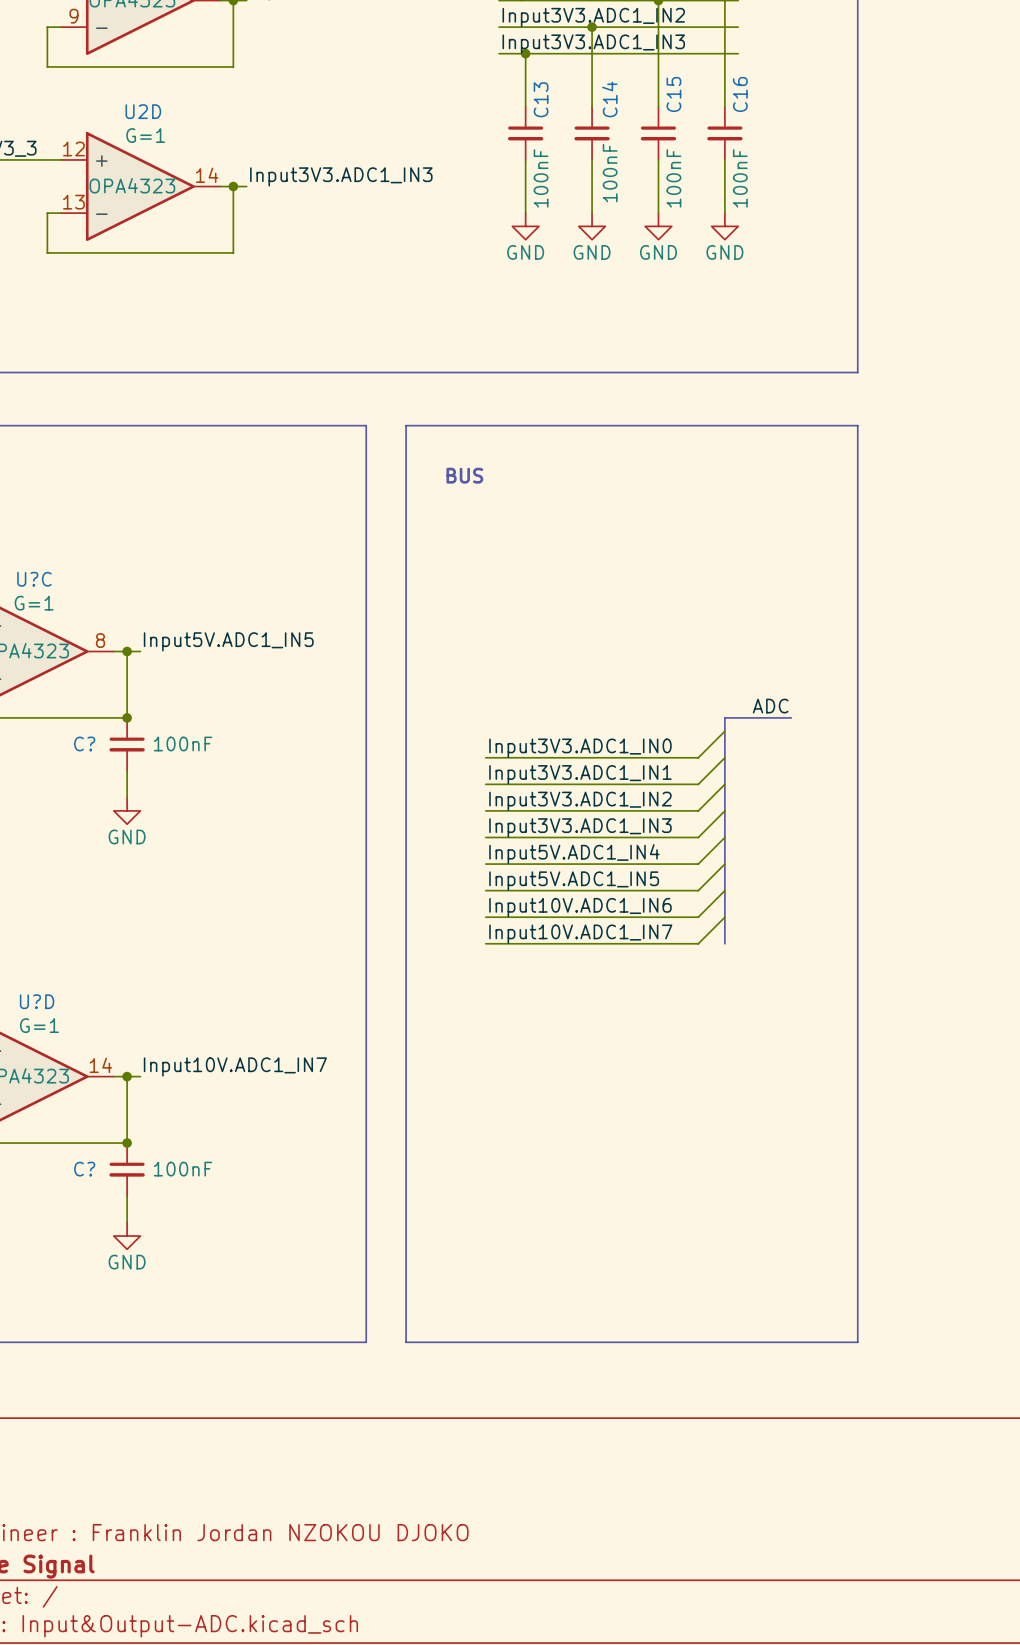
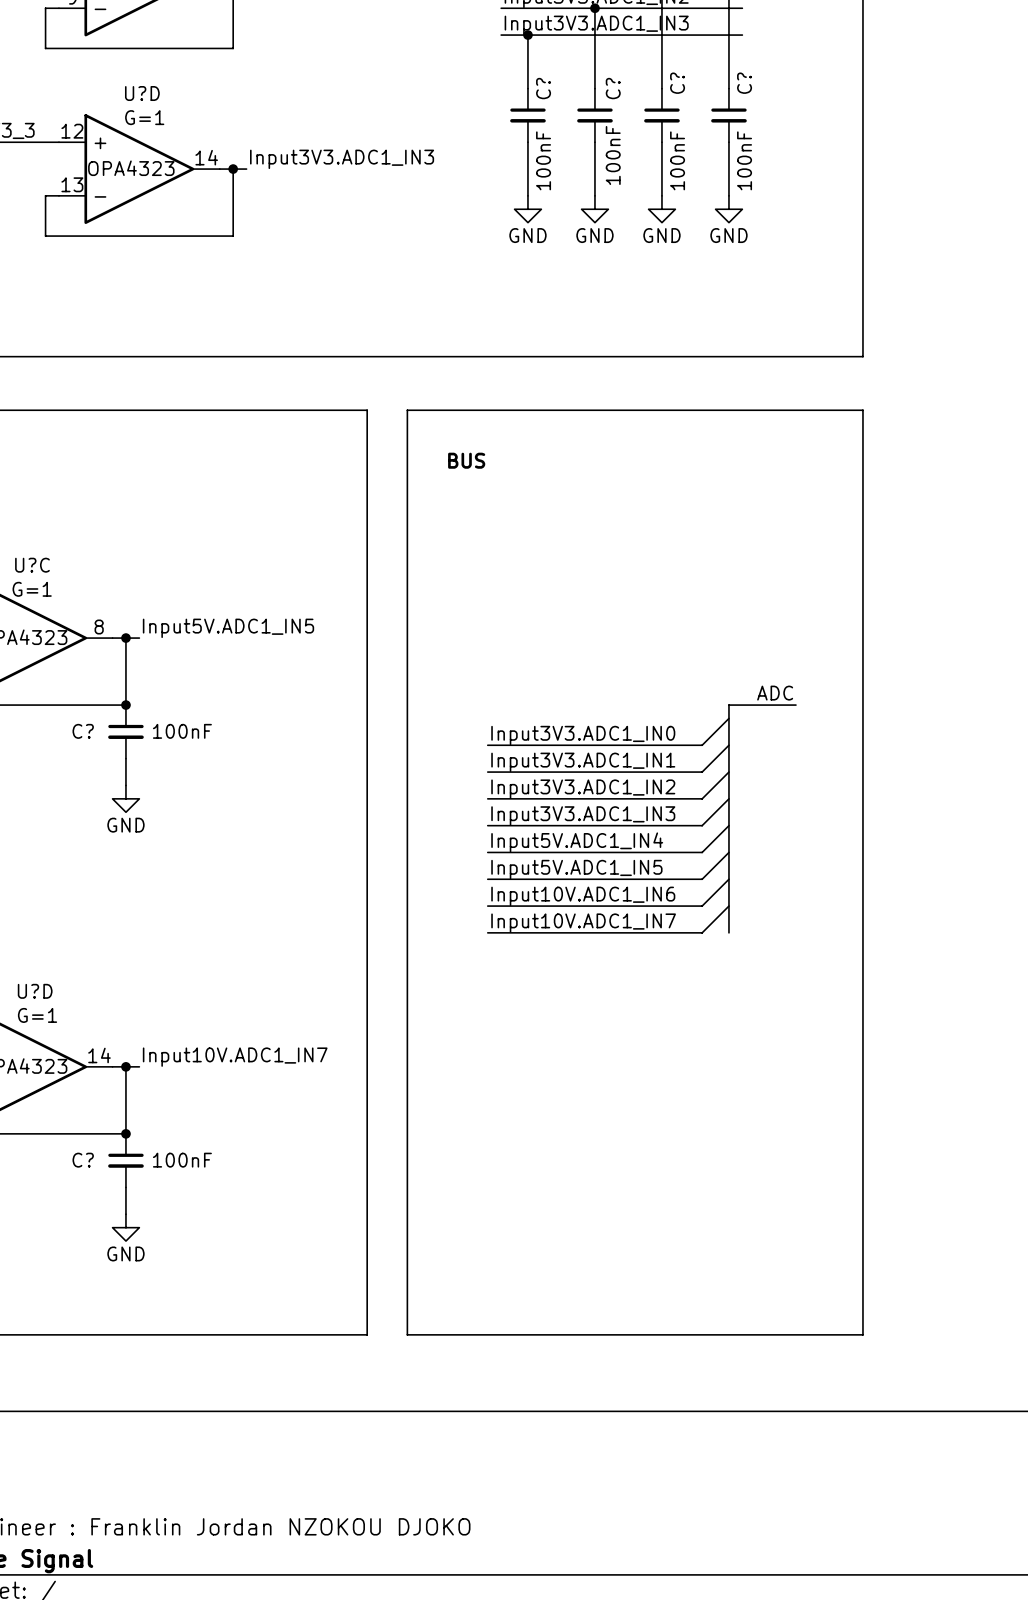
C15 name: C15 (673, 94) -> C? (677, 83)
C16 name: C16 (740, 94) -> C? (744, 83)
C13 name: C13 (541, 99) -> C? (543, 88)
C14 name: C14 (609, 99) -> C? (613, 88)
U2D name: U2D (143, 111) -> U?D (142, 93)

